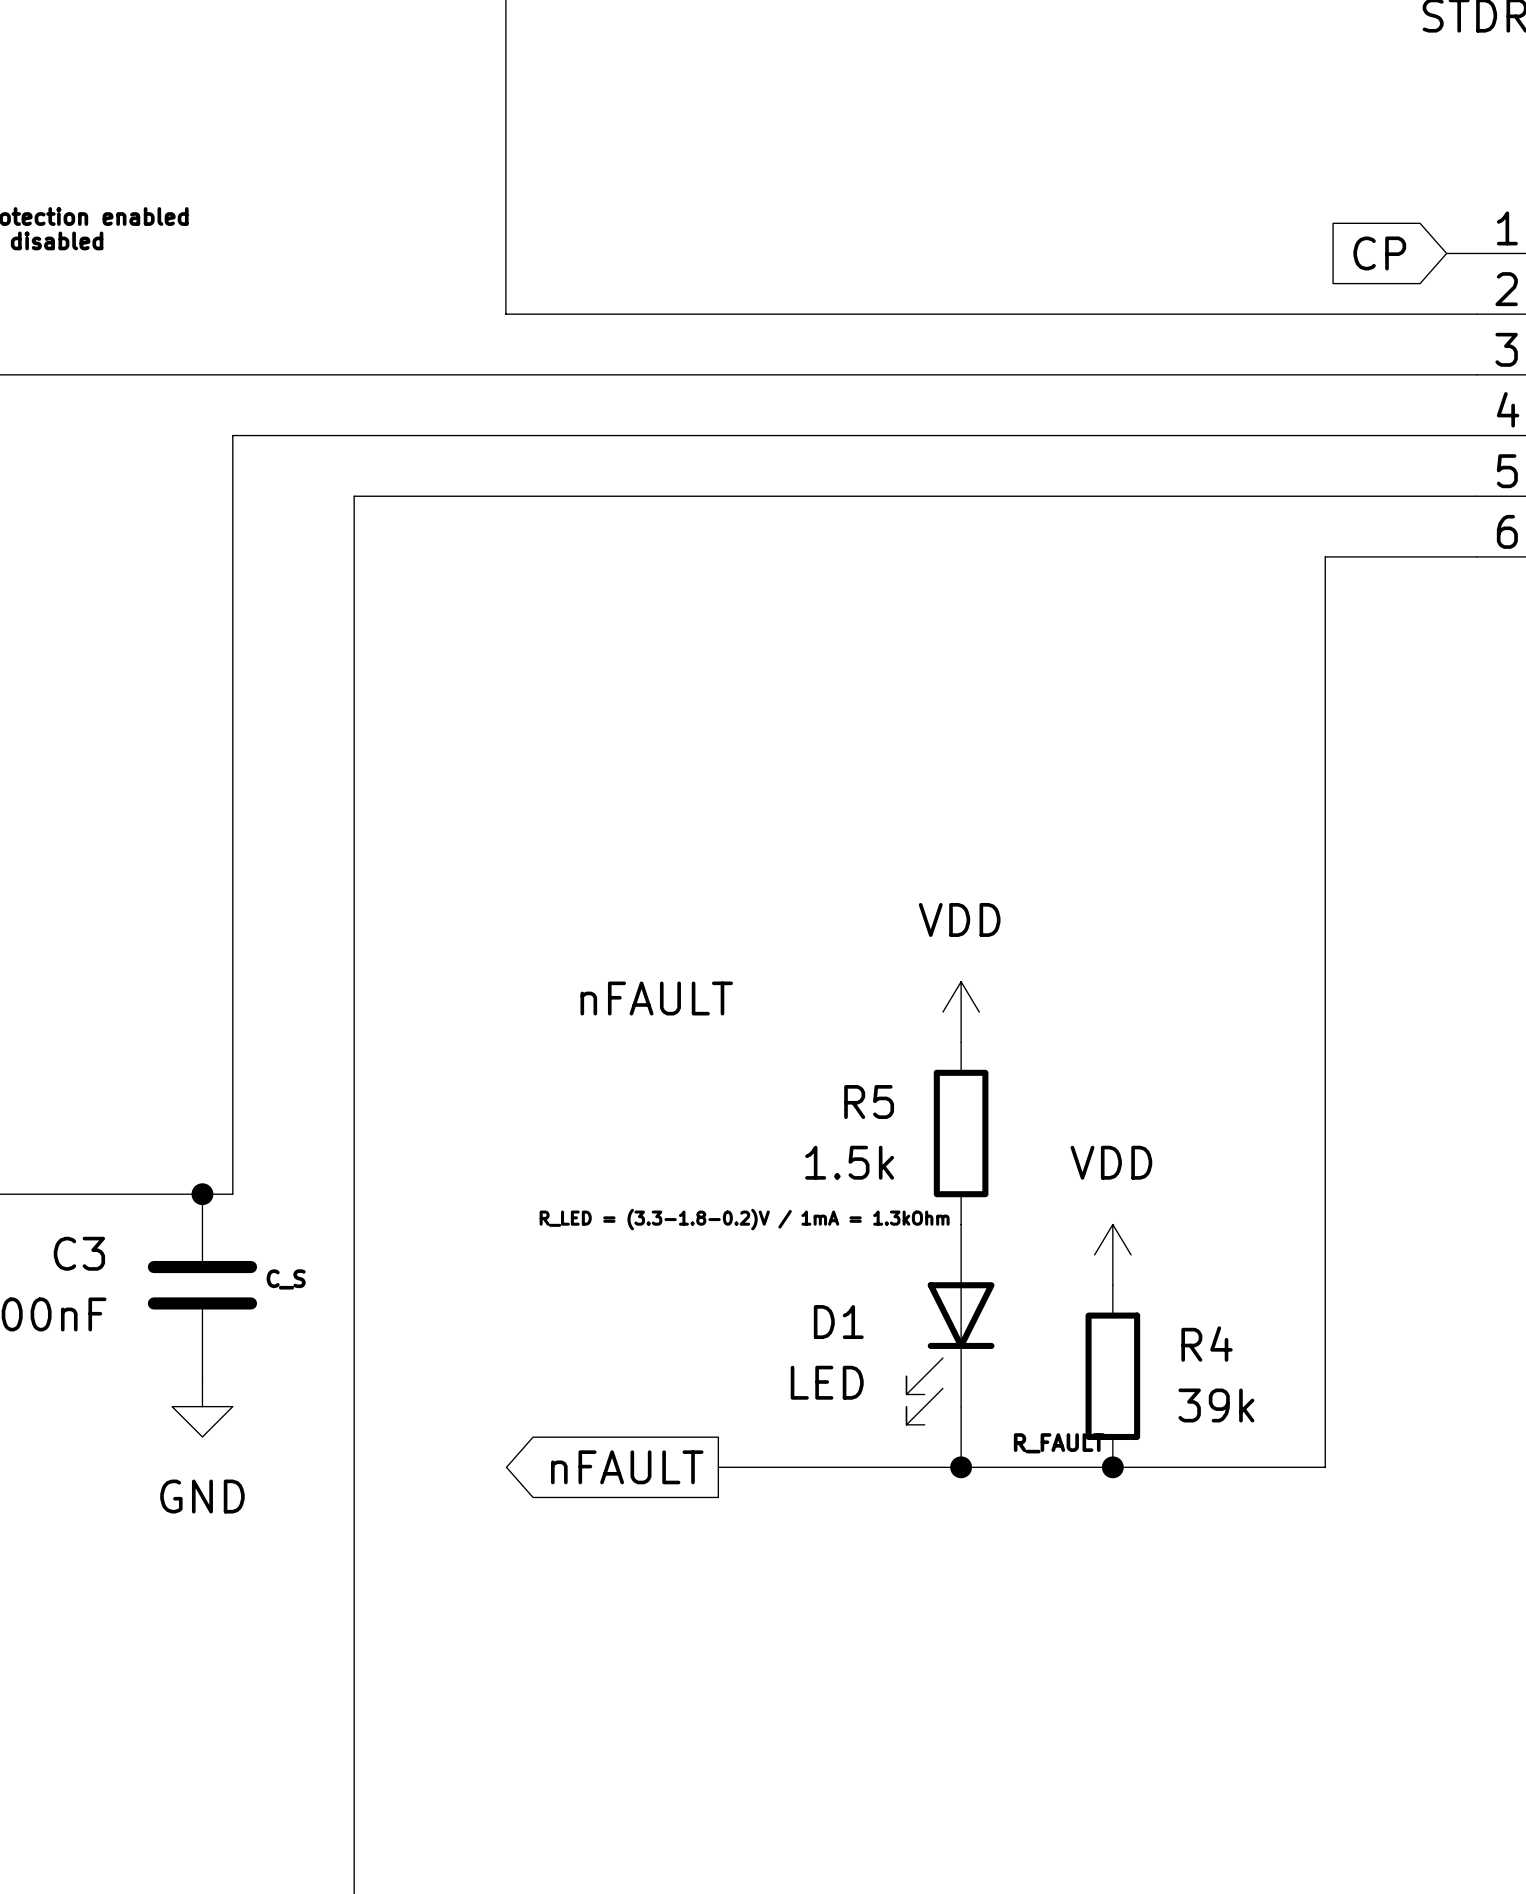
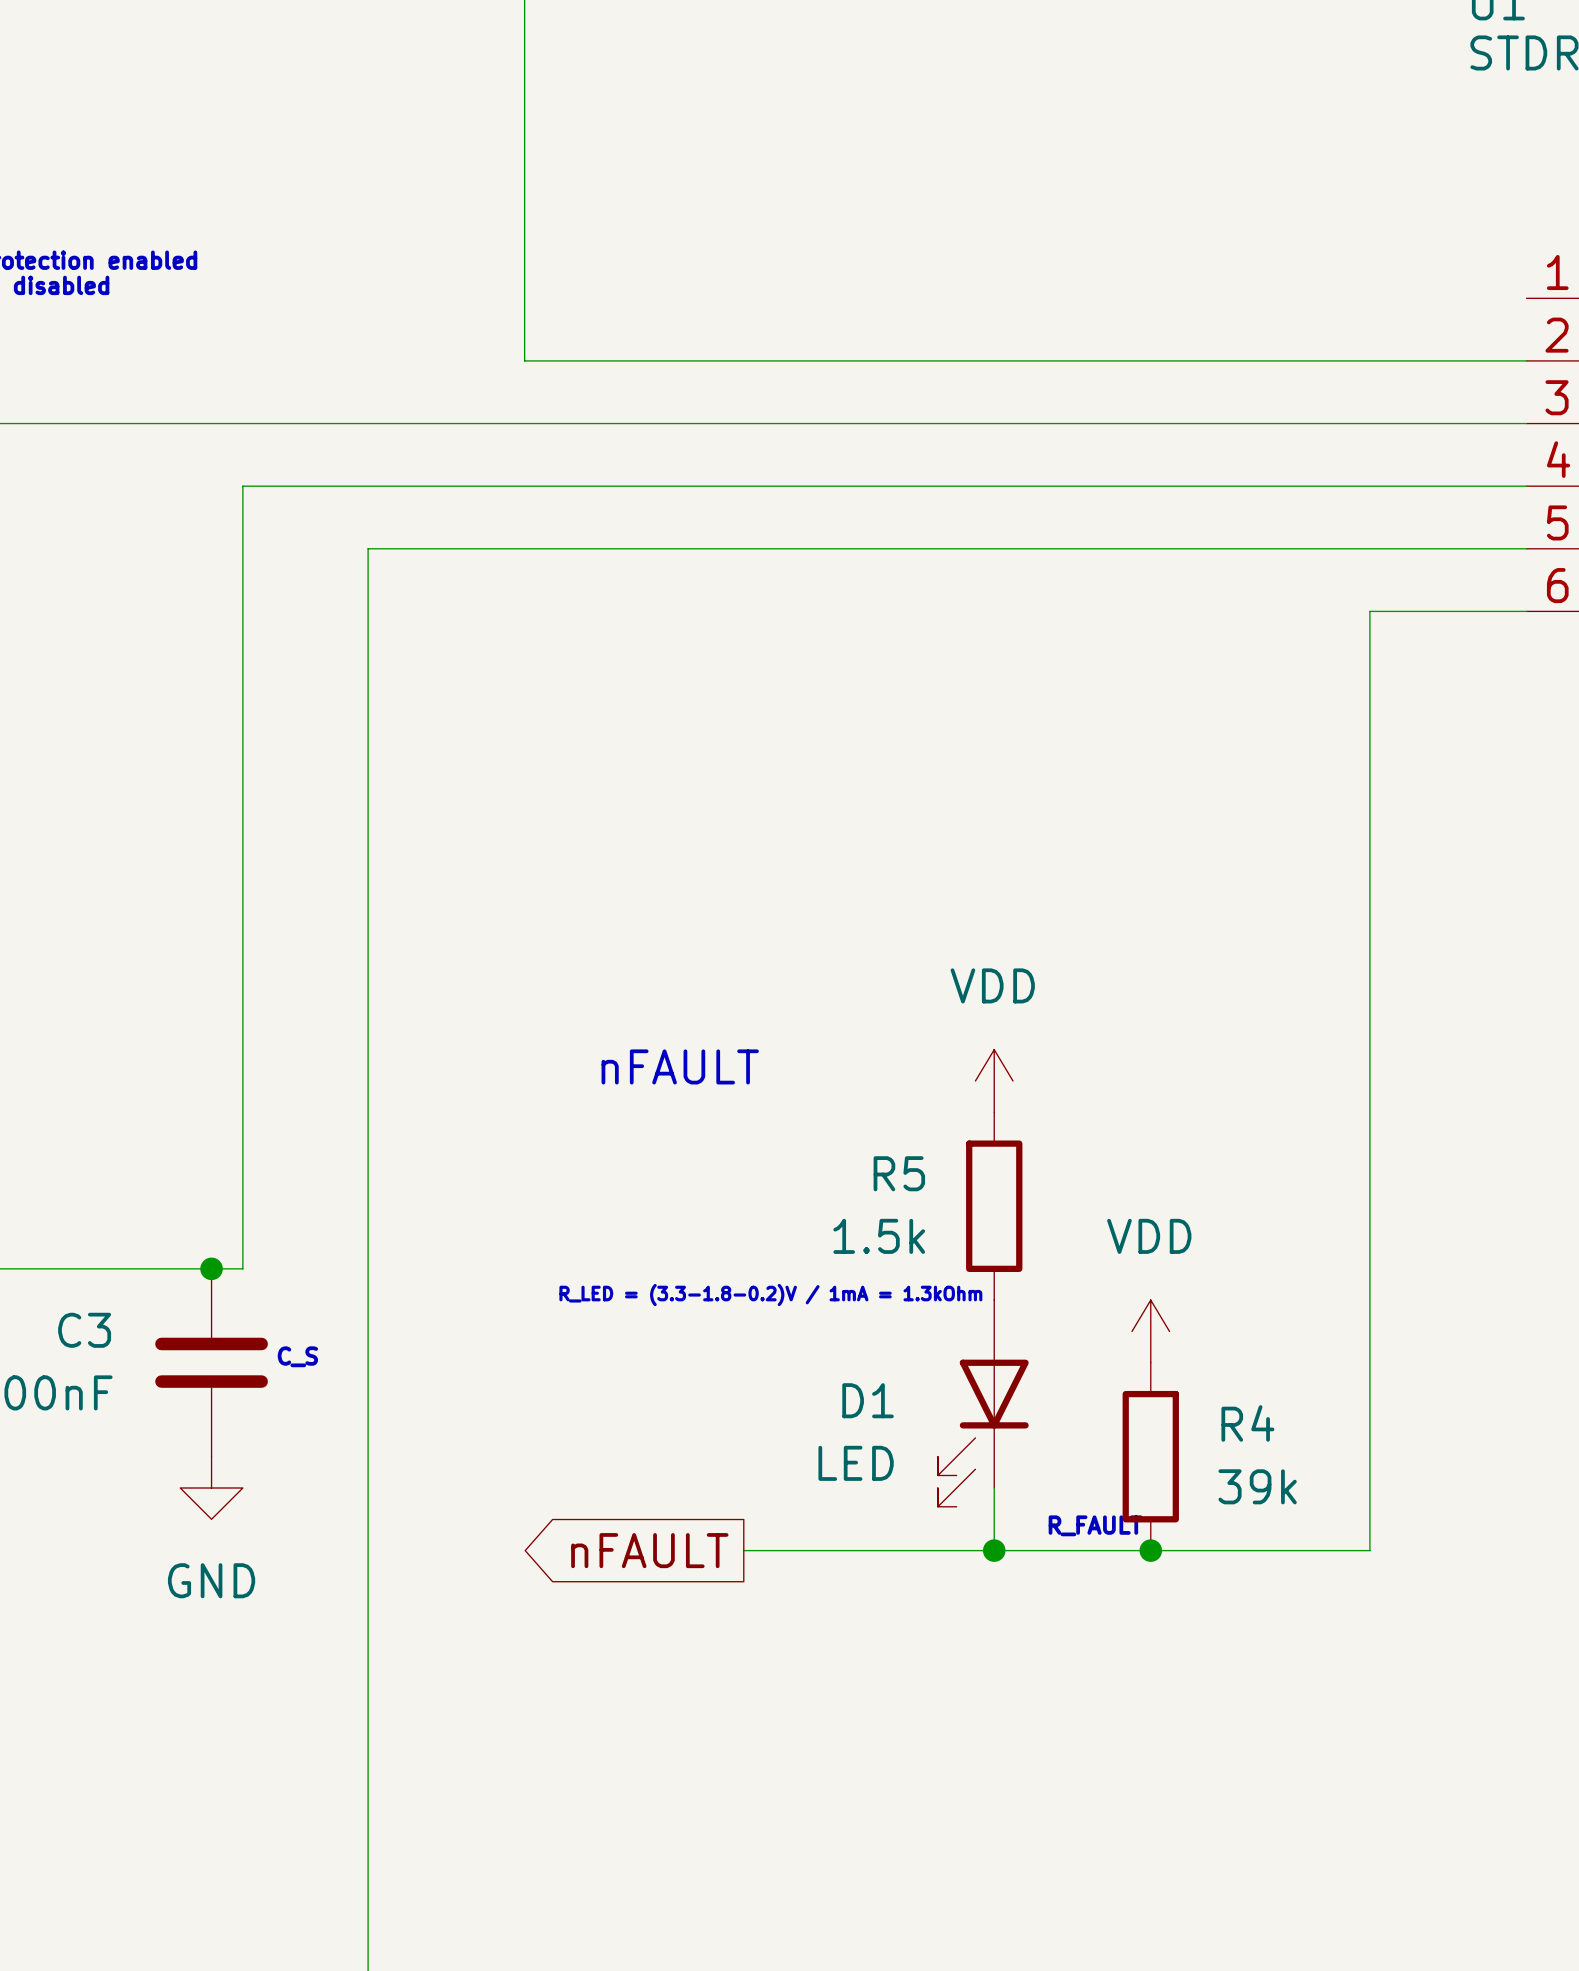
global label: CP (1379, 253) -> none
wire: (1446, 253) (1477, 253) -> none

